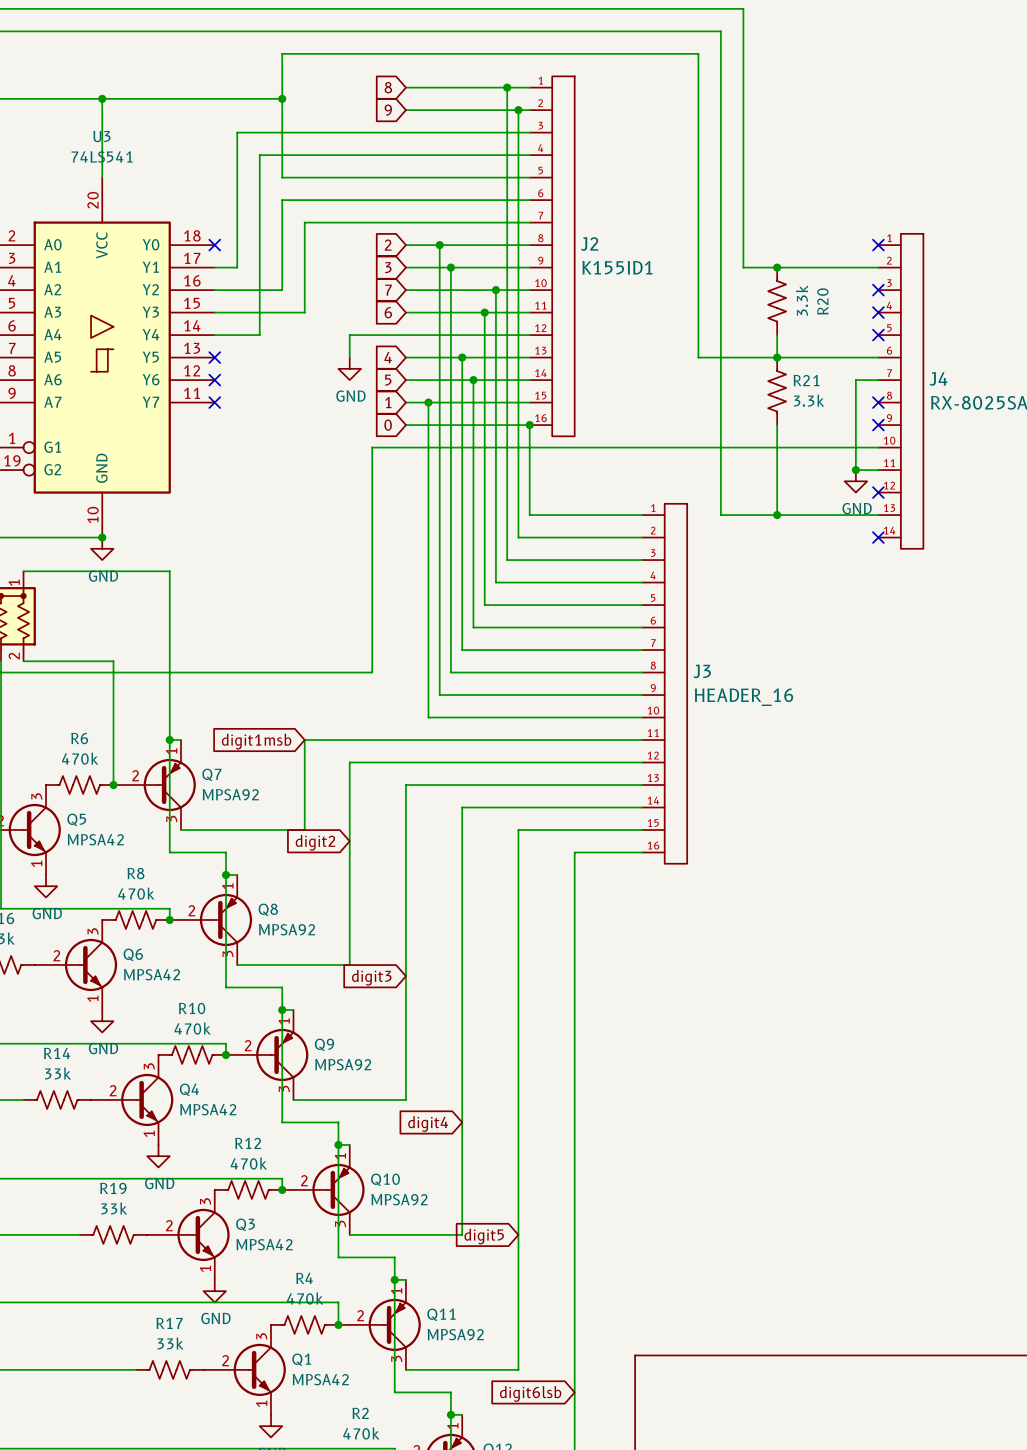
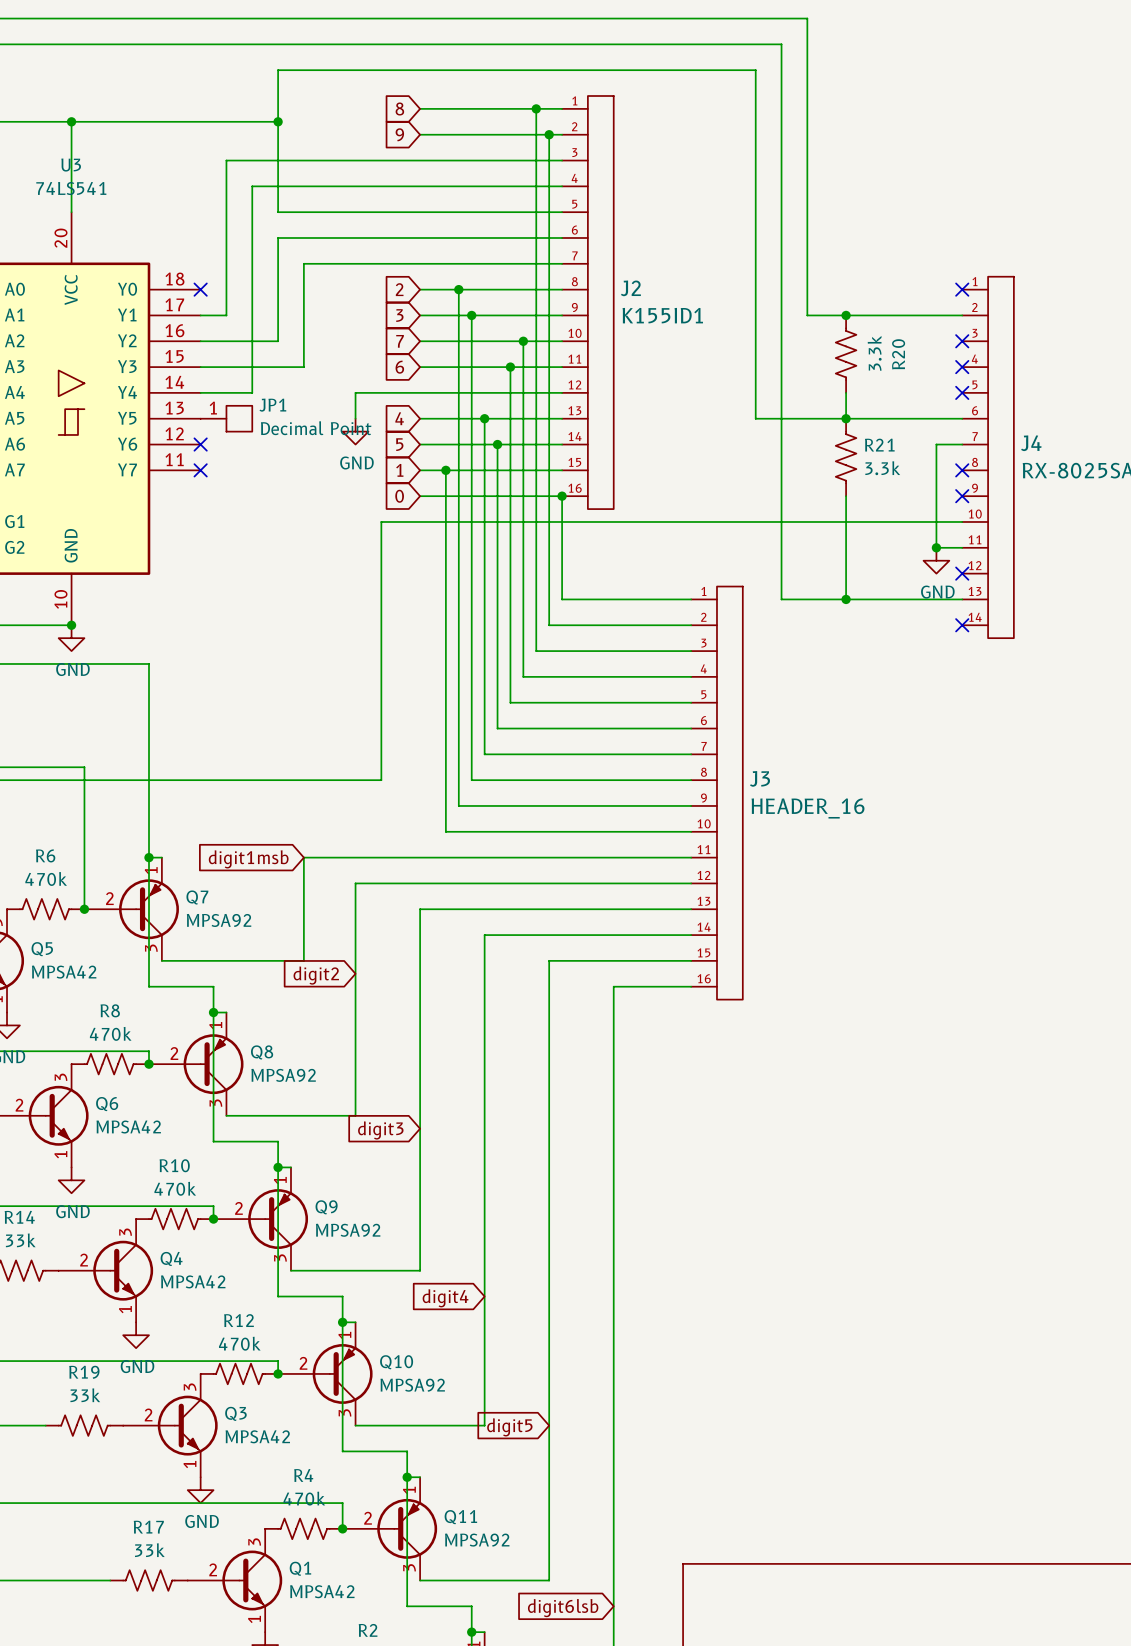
no-connect mark: (214, 357) -> none
JP1: none -> Decimal Point (226, 418)

